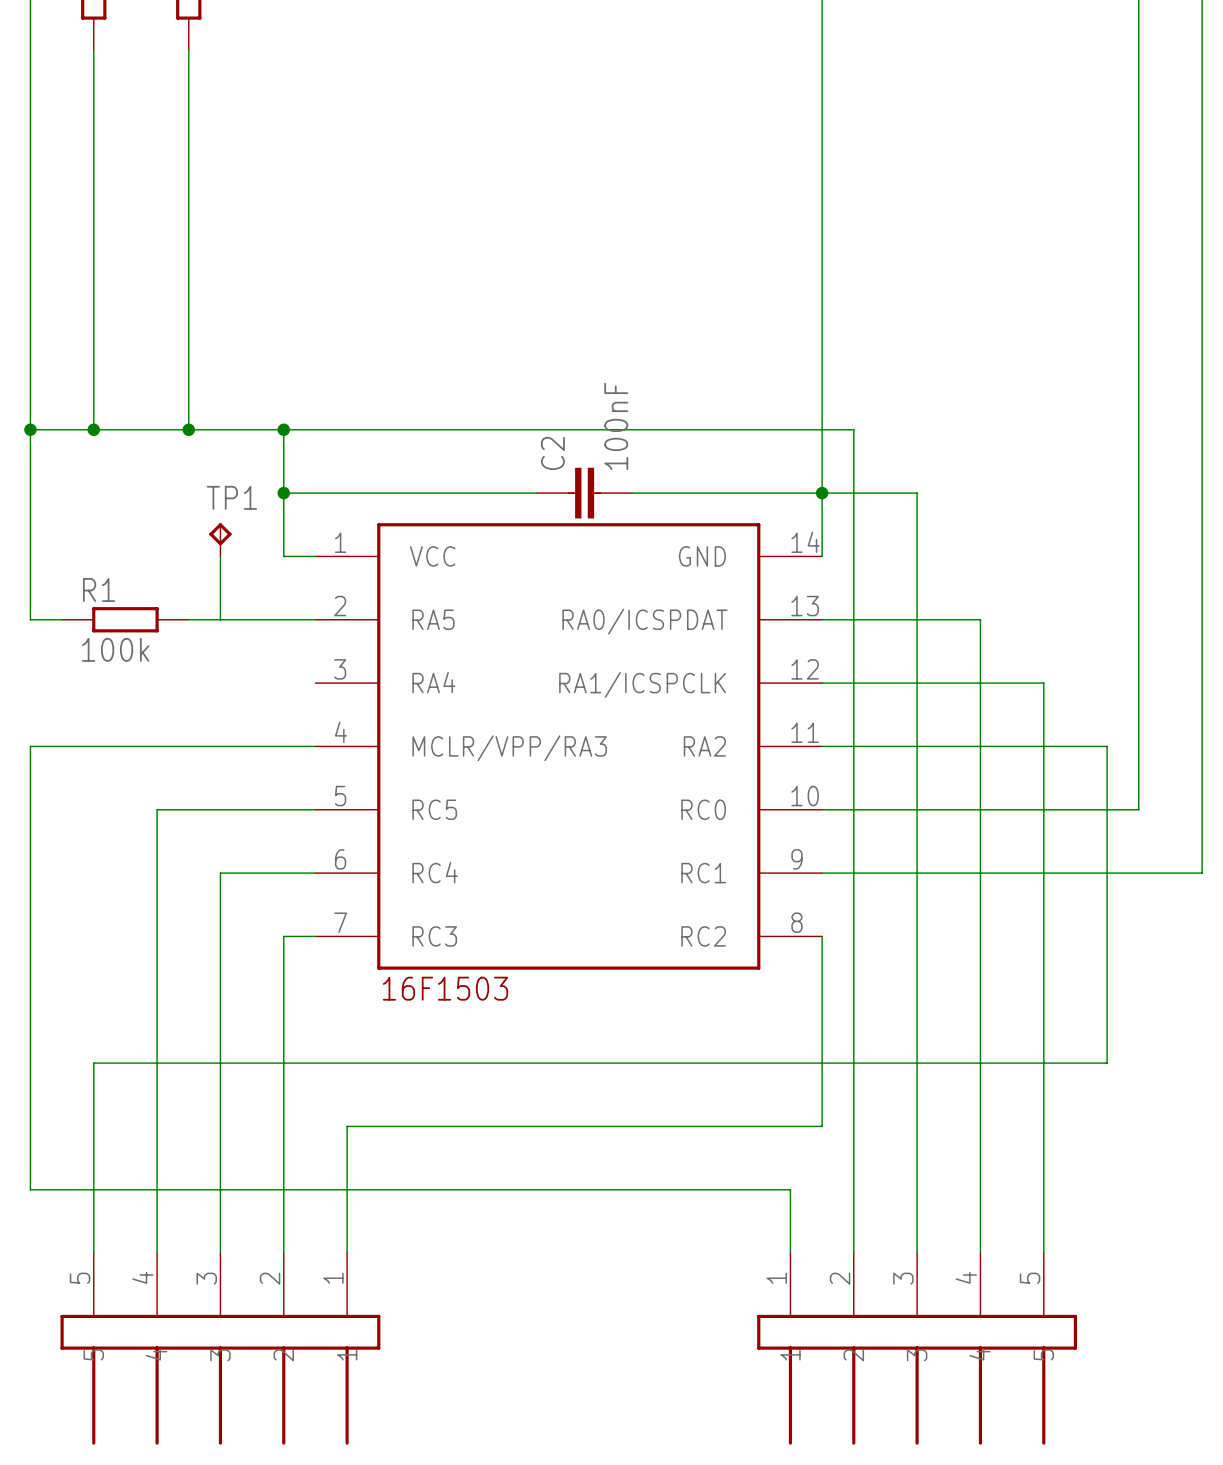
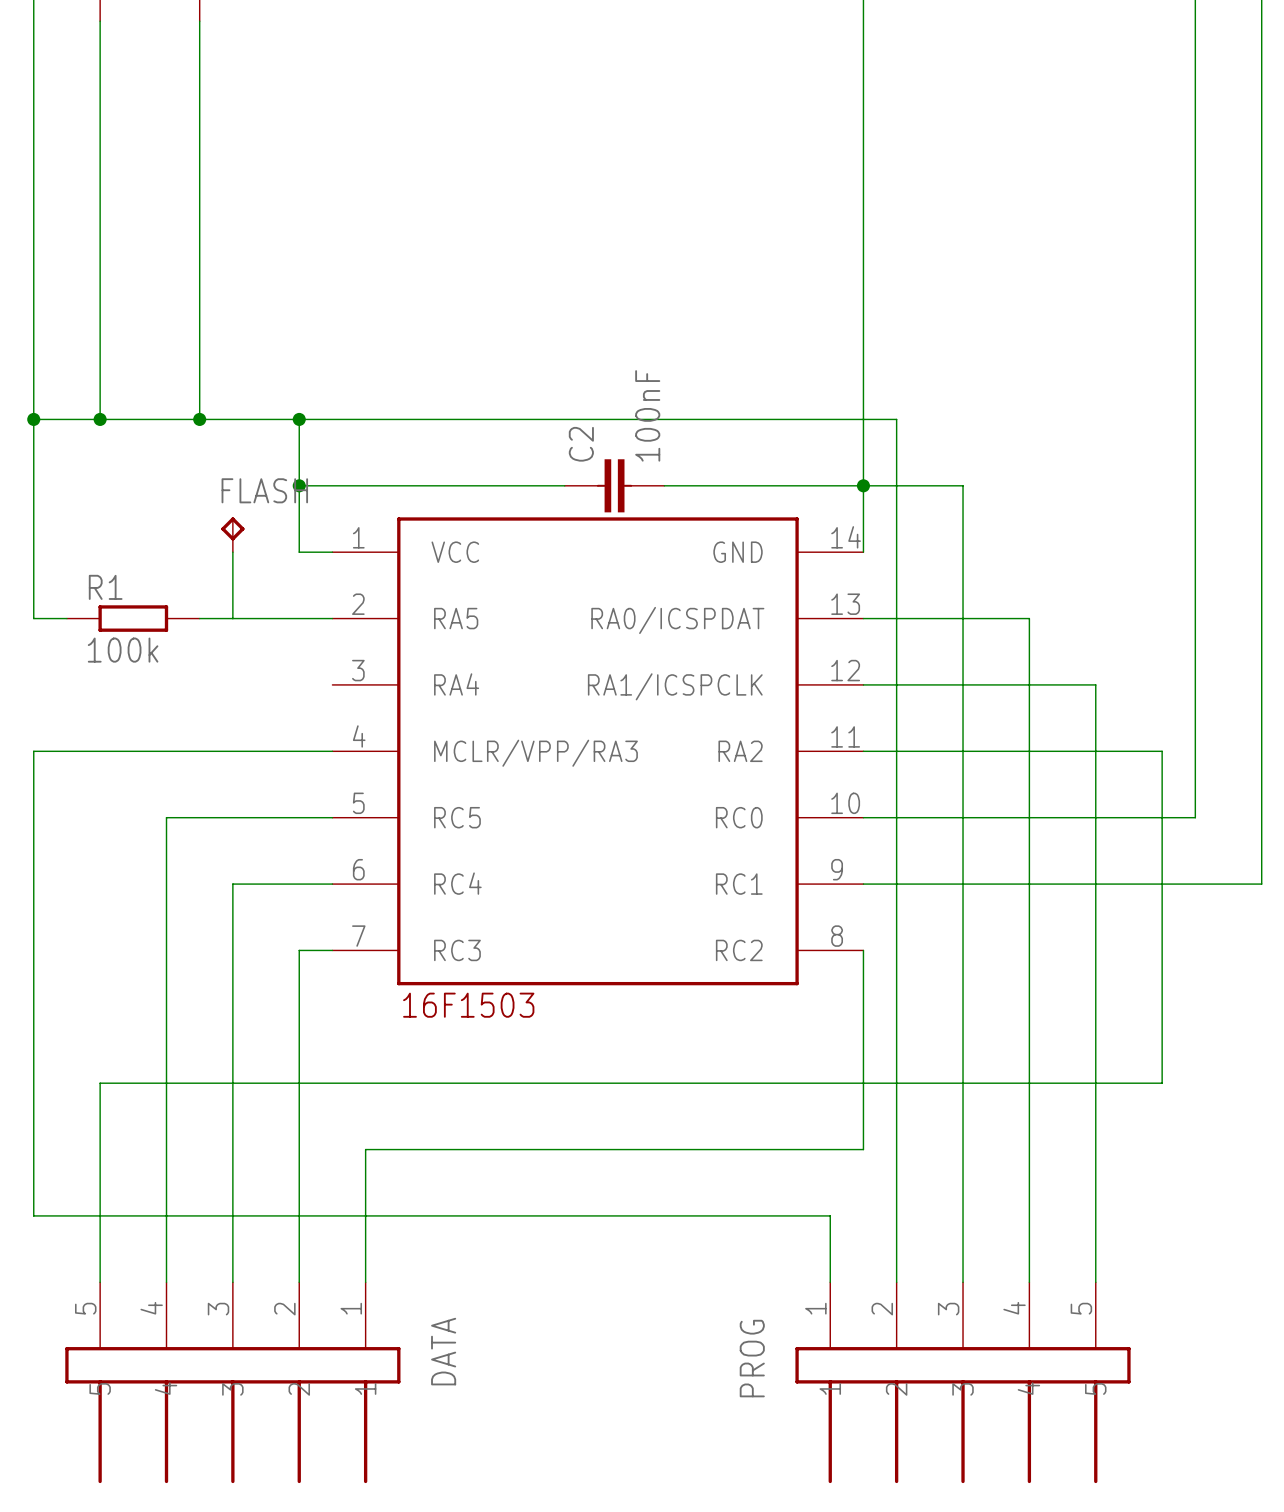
TP1 name: TP1 (231, 497) -> FLASH (264, 490)
DATA name: none -> DATA (443, 1351)
PROG name: none -> PROG (752, 1358)

